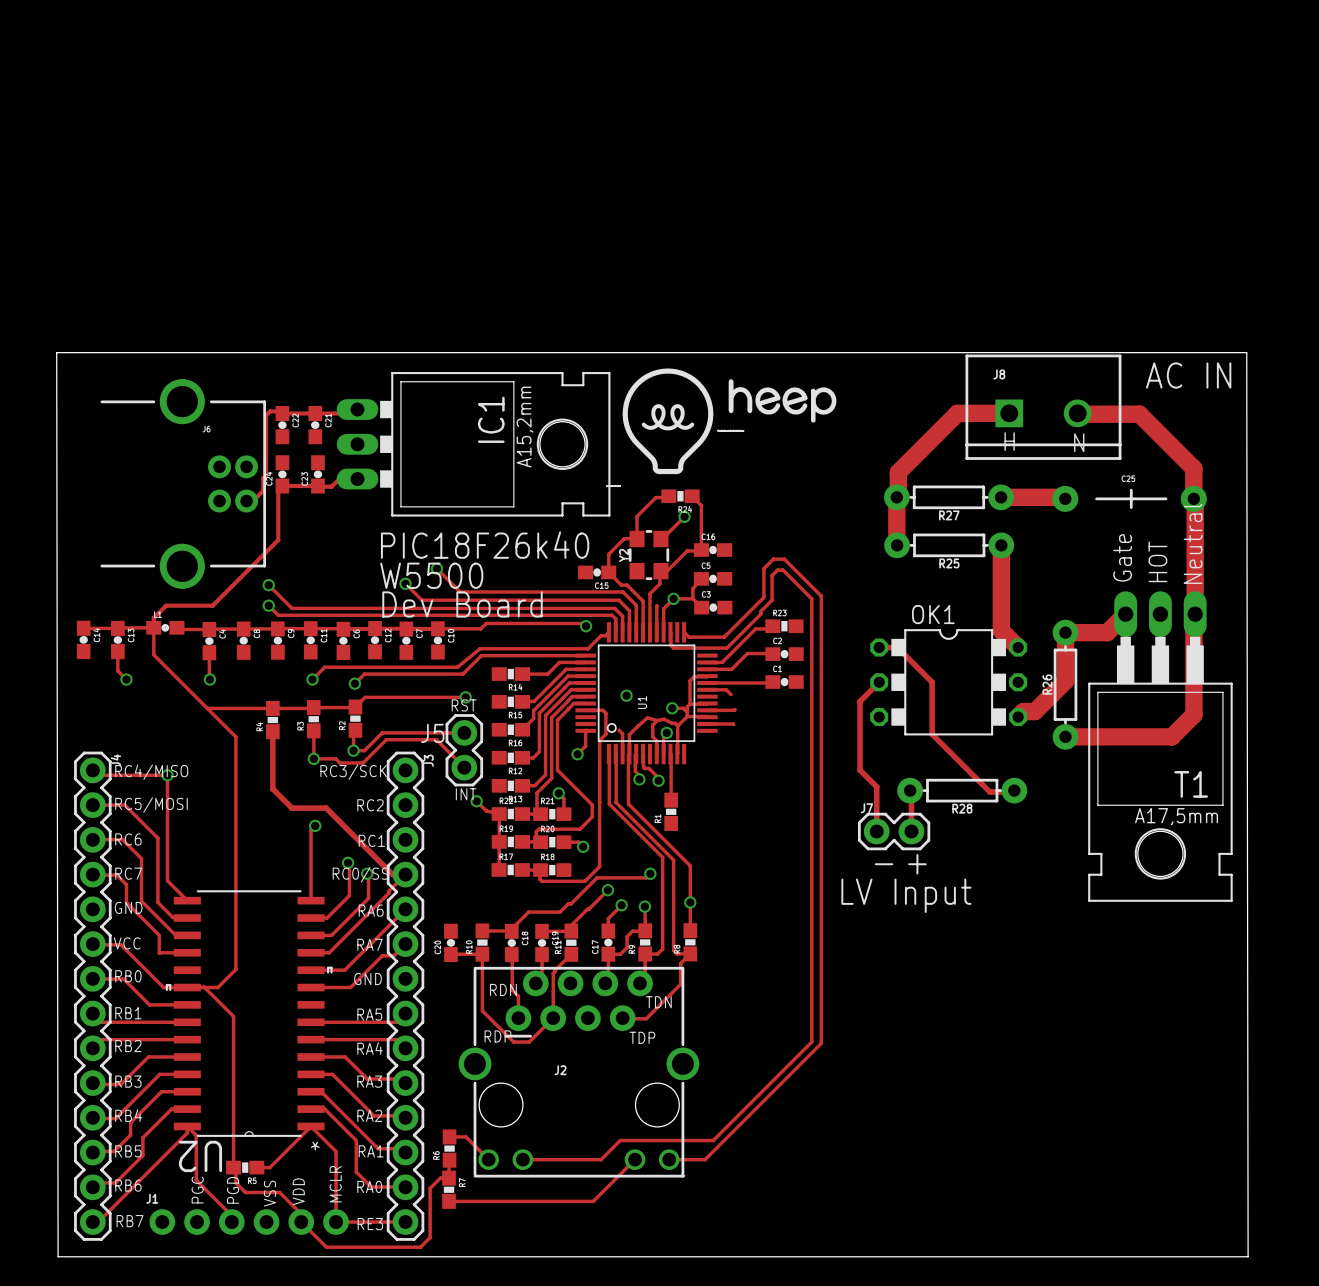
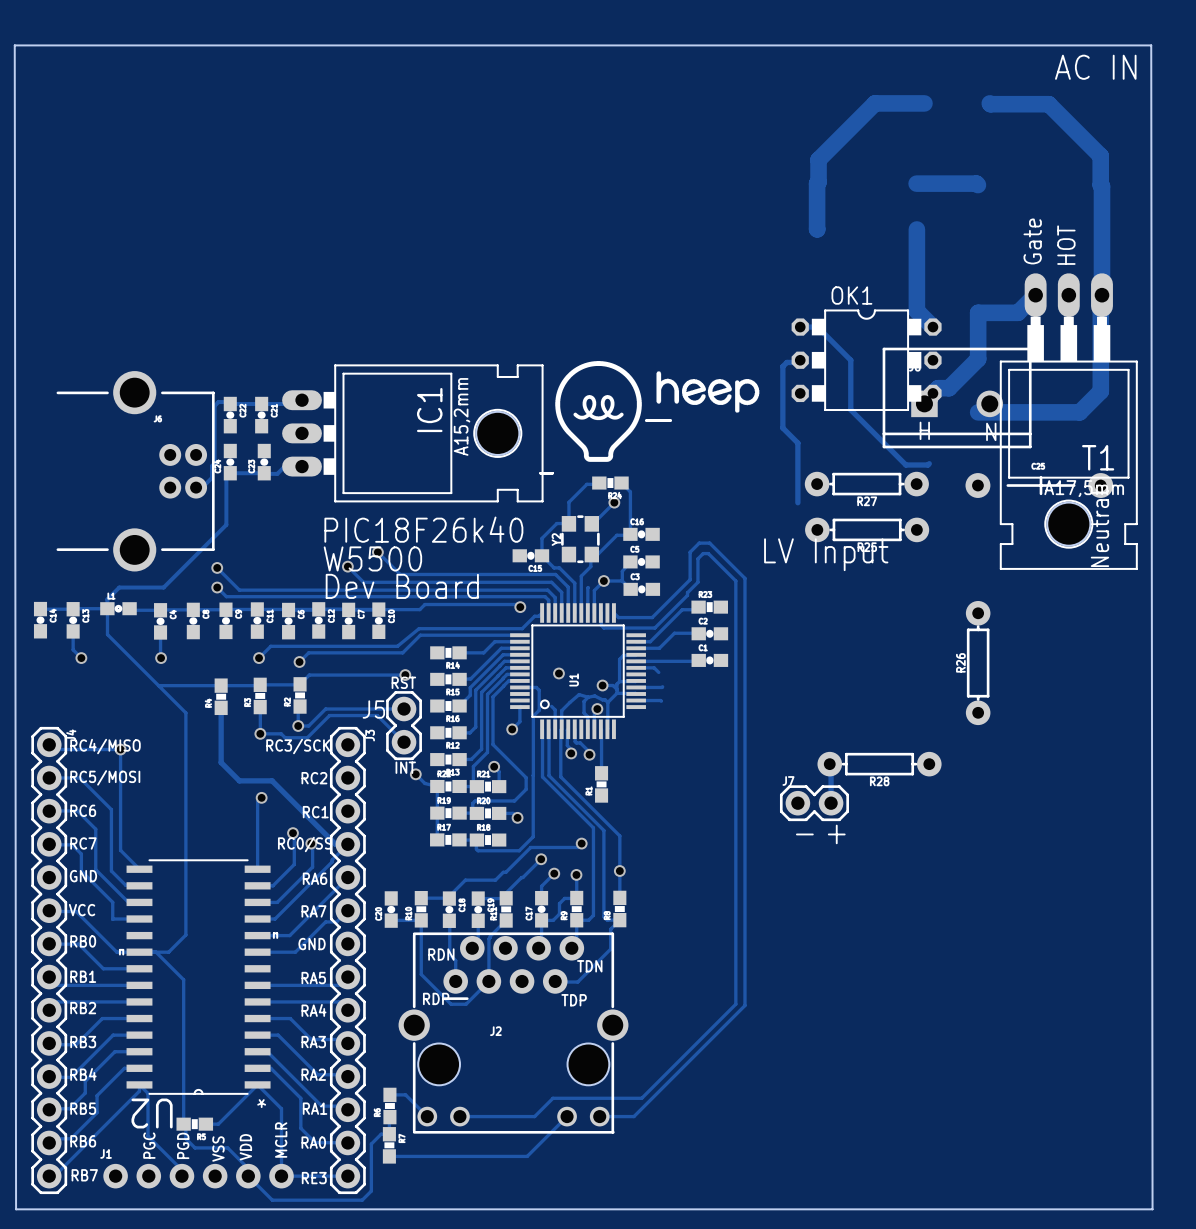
track: none -> (800, 360) (798, 362) (786, 362) (782, 366) (782, 428) (797, 443) (797, 502)
text position: AC IN (1188, 375) -> AC IN (1095, 67)
track: (1009, 413) (957, 413) (898, 472) (897, 545) -> (924, 103) (874, 103) (818, 159) (817, 229)
track: (1077, 413) (1139, 414) (1193, 468) (1193, 714) (1171, 736) (1065, 736) -> (989, 103) (1048, 104) (1100, 156) (1100, 391) (1079, 412) (978, 412)
track: (1001, 497) (1065, 498) -> (916, 183) (977, 185)
track: (1001, 545) (1001, 630) (1018, 647) -> (916, 229) (916, 310) (932, 327)
text position: Gate (1122, 557) -> Gate (1032, 241)
text position: HOT (1157, 561) -> HOT (1066, 245)
track: (1125, 614) (1107, 632) (1065, 632) (1065, 681) (1035, 711) (1023, 711) (1018, 717) -> (1035, 295) (1018, 312) (978, 312) (978, 359) (949, 388) (938, 388) (932, 393)
track: (879, 647) (897, 647) (932, 682) (932, 734) (989, 791) (1014, 790) -> (800, 327) (817, 327) (850, 360) (850, 409) (905, 465) (929, 463)
track: (879, 682) (860, 701) (860, 770) (876, 786) (876, 831) -> none
OK1 position: (948, 682) -> (866, 360)
T1 position: (1160, 746) -> (1068, 421)
text position: LV Input (906, 895) -> LV Input (826, 554)
board edge: (58, 1256) (56, 352) (1246, 352) (1248, 1256) -> (16, 1209) (14, 45) (1151, 45) (1152, 1209)

